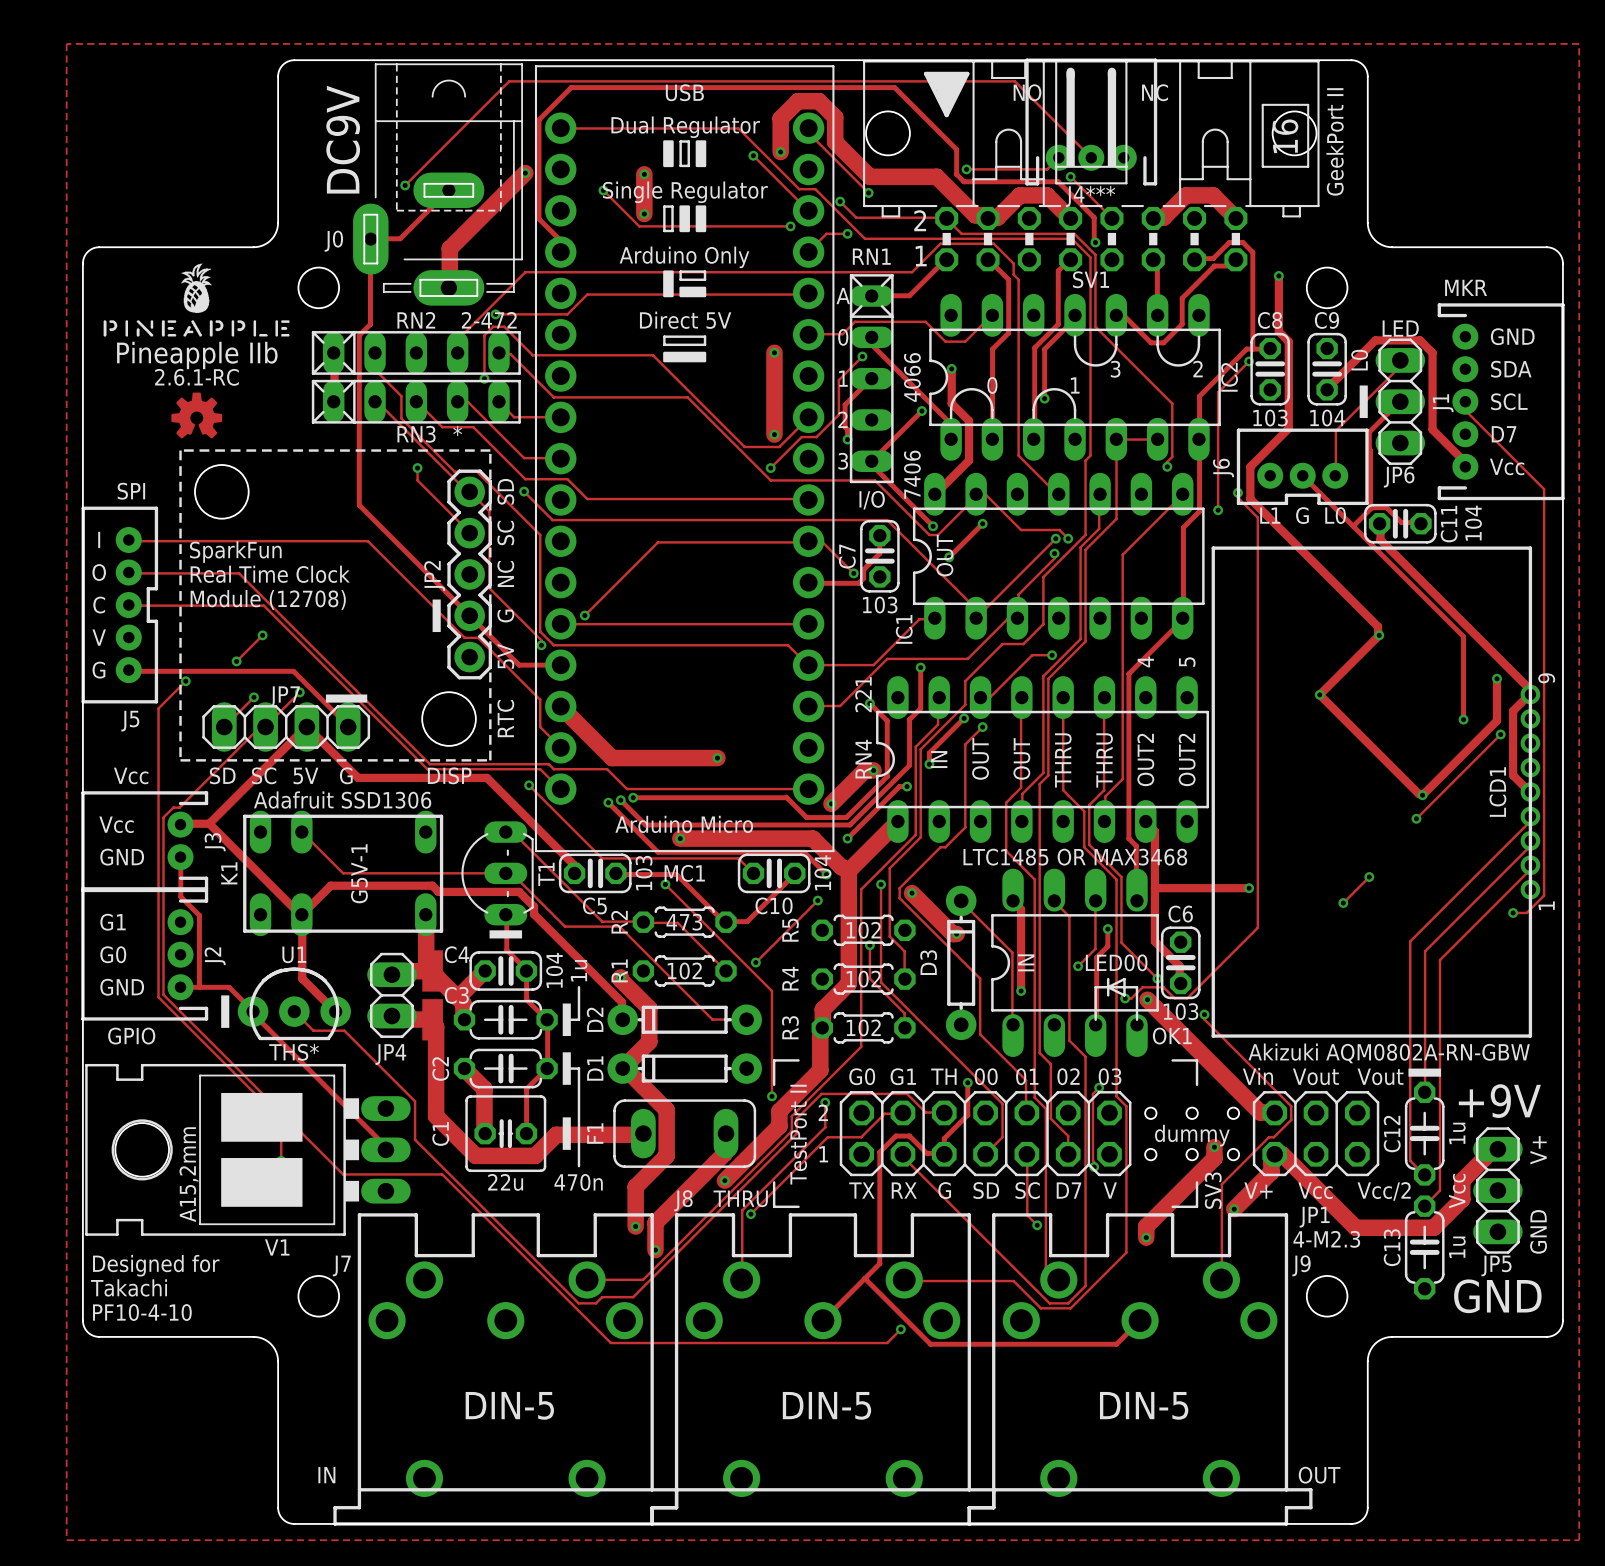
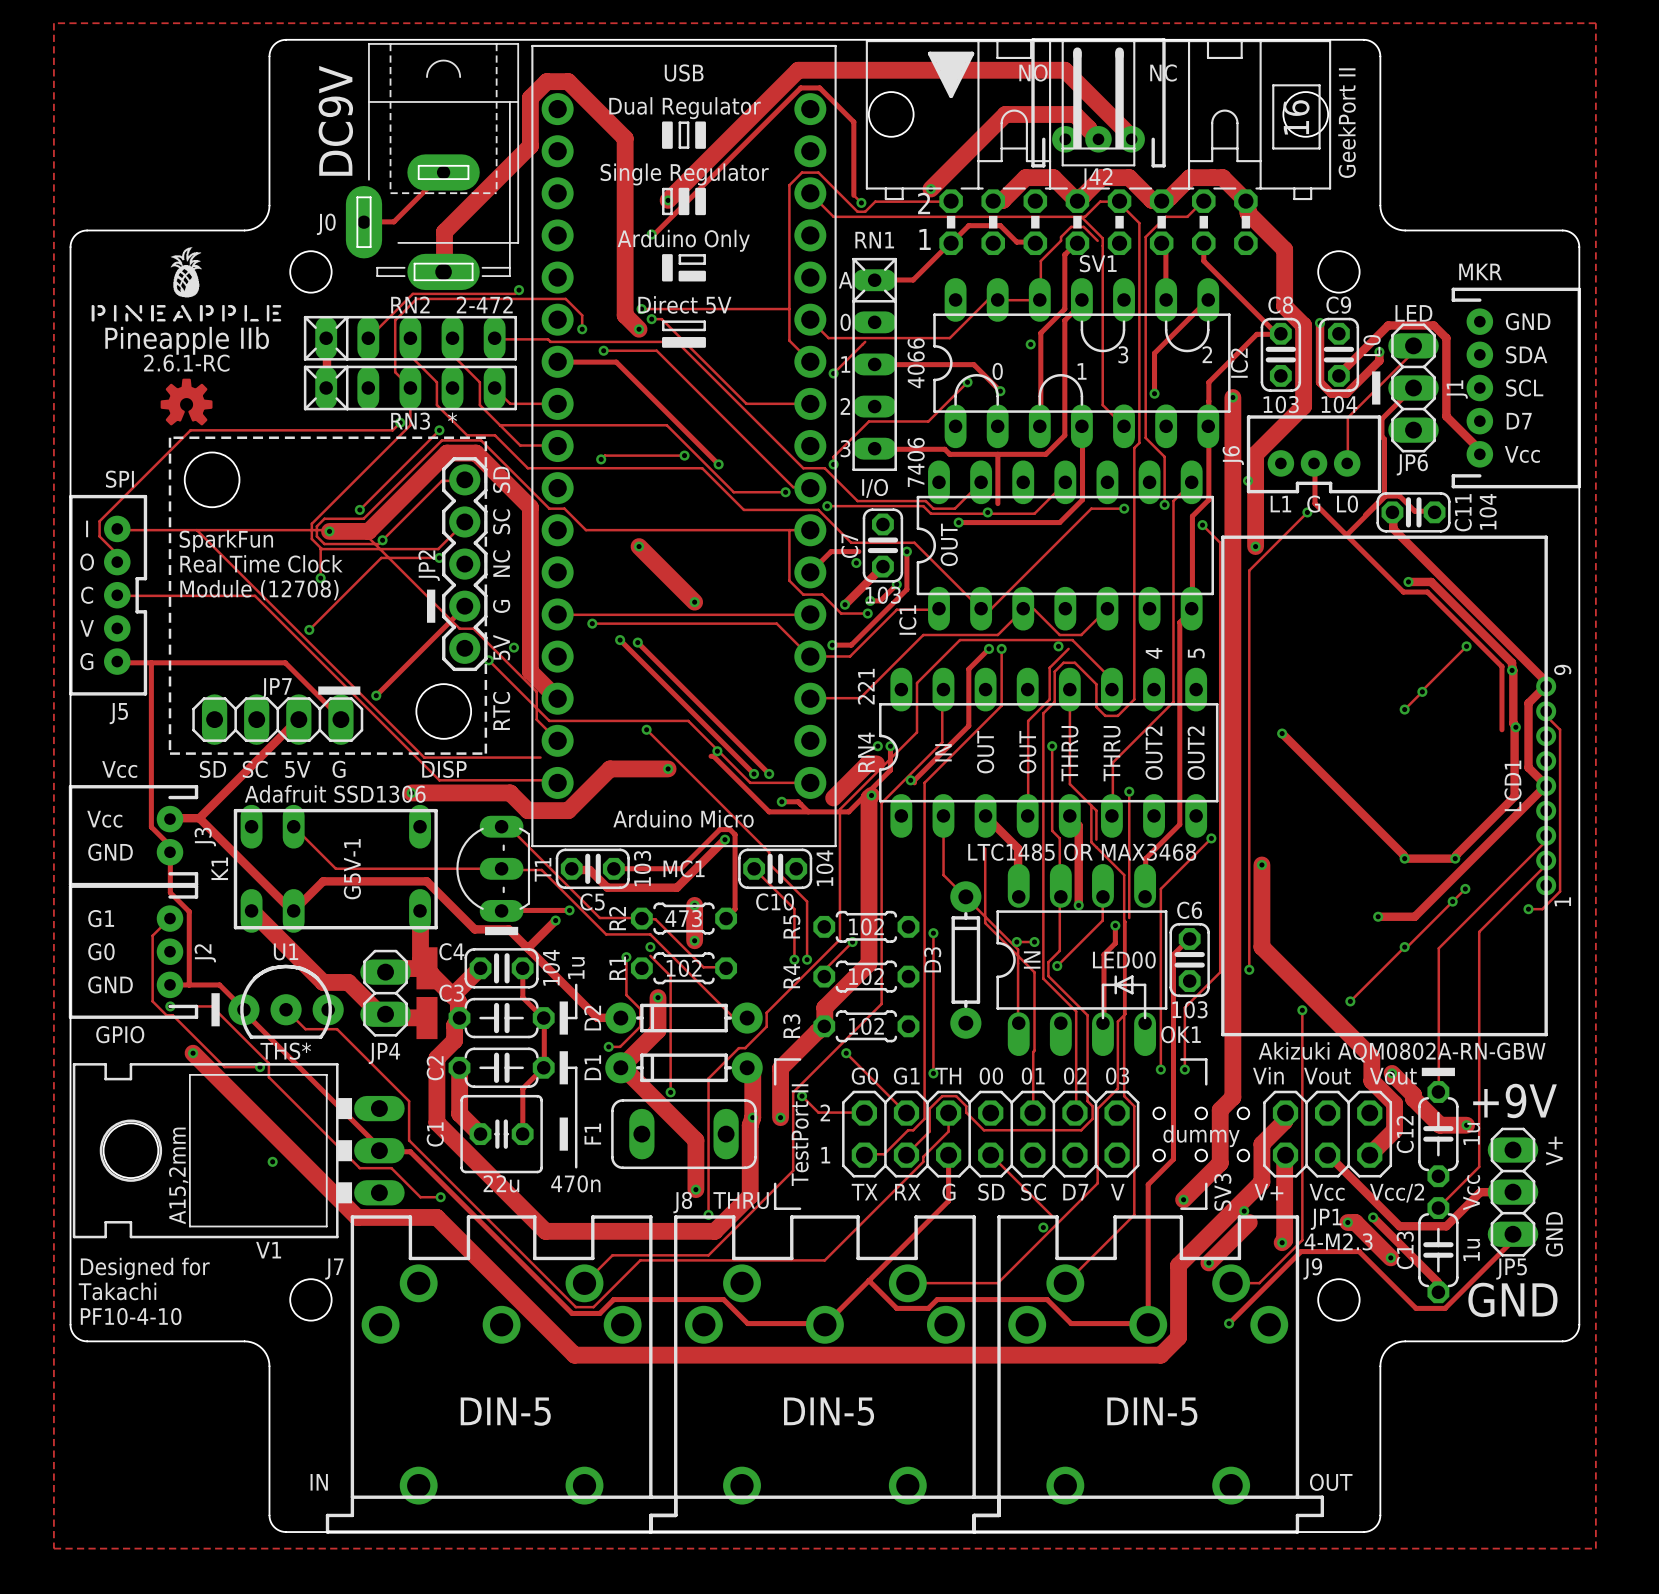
track: (560, 128) (738, 128) (799, 189) (816, 190) -> (810, 361) (789, 340) (789, 185) (802, 172) (818, 172)
track: (808, 128) (809, 133) (868, 192) -> none
track: (1081, 148) (1014, 81) (509, 81) (405, 185) -> (1088, 129) (1074, 114) (1005, 114) (930, 189)
track: (780, 152) (780, 118) (798, 101) (819, 101) (835, 117) (835, 142) (869, 176) (936, 176) (975, 215) (988, 218) -> none
via: (780, 152) -> none
track: (753, 155) (808, 210) -> none
via: (753, 155) -> none
track: (1058, 157) (1047, 169) (966, 169) -> none
track: none -> (1131, 139) (1130, 135) (1064, 70) (798, 70) (668, 200)
via: (966, 169) -> none
track: none -> (521, 154) (530, 146) (530, 98) (546, 81) (568, 81) (625, 138) (625, 315) (639, 329)
via: (525, 173) -> none
track: (644, 174) (644, 213) -> none
via: (644, 174) -> none
track: (1070, 176) (1111, 218) -> none
via: (1070, 176) -> none
via: (405, 185) -> none
track: (603, 190) (639, 226) (790, 226) -> none
via: (603, 190) -> none
via: (868, 192) -> none
track: (1185, 195) (1163, 217) (1153, 218) -> (1194, 177) (1189, 177) (1169, 197) (1161, 201) (1152, 200) (1129, 177) (1101, 177) (1077, 201)
J4*** name: J4*** (1090, 196) -> J42 (1096, 178)
track: (840, 201) (851, 212) -> (651, 234) (654, 234) (800, 87) (819, 87) (853, 122) (853, 195)
via: (840, 201) -> none
via: none -> (930, 189)
via: (644, 213) -> none
via: none -> (668, 200)
track: (856, 217) (945, 217) (961, 233) -> (850, 216) (966, 216)
track: none -> (1203, 201) (1187, 216) (1165, 216) (1145, 237) (1145, 437) (1164, 456) (1164, 504)
track: none -> (1245, 201) (1248, 213) (1284, 249) (1284, 306) (1303, 325) (1303, 406) (1255, 454) (1255, 546)
via: none -> (861, 202)
via: (790, 226) -> none
track: (855, 228) (864, 238) (1071, 238) (1076, 243) -> (857, 211) (865, 211) (875, 201) (951, 201)
track: (831, 233) (826, 233) (808, 252) -> (833, 216) (810, 193)
via: (847, 233) -> none
track: (370, 239) (370, 324) (359, 335) (359, 505) (519, 665) (560, 665) -> none
track: (1095, 242) (1094, 217) (1058, 181) (964, 181) (956, 174) (956, 149) (894, 87) (571, 87) (539, 119) (539, 218) (560, 240) (560, 252) -> none
via: (1095, 242) -> none
track: none -> (1083, 226) (1071, 226) (1061, 237) (1061, 240) (1040, 261) (1039, 300) (997, 300)
via: none -> (651, 234)
track: (1090, 257) (1090, 455) (1085, 460) (1085, 534) (1043, 577) (1043, 624) (1023, 644) (1002, 644) (965, 681) (965, 704) (920, 749) (920, 789) -> (970, 737) (924, 782)
track: none -> (951, 243) (968, 225) (1000, 225) (1016, 242) (1035, 243)
track: (988, 259) (1008, 279) (1008, 332) (992, 349) (992, 439) -> none
track: (1194, 259) (1213, 258) (1229, 242) (1242, 242) (1252, 252) (1252, 349) -> (1203, 243) (1203, 261) (1275, 333) (1280, 333)
track: (1235, 259) (1229, 266) (1214, 266) (1182, 298) (1182, 324) (1163, 342) (1151, 342) (1123, 315) (1116, 315) -> none
track: (1278, 275) (1278, 331) (1288, 341) (1288, 428) (1250, 466) (1250, 499) (1378, 626) (1379, 635) (1319, 694) (1418, 793) (1422, 795) (1496, 720) (1496, 678) -> none
via: (1278, 275) -> none
track: (808, 293) (587, 294) (567, 314) -> (582, 329) (582, 315) (564, 298)
track: none -> (519, 290) (515, 293) (412, 293) (368, 338)
via position: (495, 314) -> (519, 290)
track: (991, 315) (965, 341) (945, 341) (925, 321) (855, 321) (842, 334) (808, 334) -> (996, 300) (987, 300) (949, 338) (828, 338) (810, 319)
track: none -> (1208, 299) (1154, 353) (1154, 393)
track: none -> (641, 309) (789, 309)
via: none -> (641, 309)
track: (1095, 326) (1172, 403) (1172, 456) (1167, 461) (1167, 466) -> (1102, 311) (1102, 405) (1124, 426)
via: none -> (651, 319)
track: (1058, 335) (1044, 349) (1044, 398) -> (1064, 320) (1064, 435) (1045, 454) (949, 454) (944, 449) (874, 448)
track: (871, 337) (872, 345) (950, 423) (951, 439) -> none
track: none -> (1320, 322) (1320, 382) (1331, 393) (1346, 393) (1379, 360) (1379, 352)
via: none -> (1320, 322)
via: none -> (582, 329)
via: none -> (639, 329)
track: (375, 352) (375, 370) (401, 396) (401, 418) (454, 471) (477, 471) (540, 534) (540, 631) (553, 645) (788, 645) -> (592, 623) (776, 623) (789, 636)
track: none -> (410, 338) (411, 357) (436, 382) (436, 405) (467, 435) (495, 435) (527, 468) (702, 468) (743, 509) (818, 509) (851, 542) (914, 542) (981, 608)
track: (457, 352) (458, 339) (525, 272) (912, 272) (940, 243) (993, 243) (1013, 263) (1013, 274) (1018, 279) (1018, 455) (1058, 495) -> (827, 506) (923, 506) (930, 513) (1034, 513) (1064, 483)
track: (774, 352) (774, 434) -> none
via: (774, 352) -> none
track: (510, 354) (553, 397) (687, 397) (770, 480) (801, 480) -> (506, 339) (548, 339) (550, 341) (676, 341) (803, 468)
via: (862, 356) -> none
via: none -> (1030, 344)
track: (1249, 361) (1218, 392) (1218, 510) -> none
via: (1249, 361) -> none
via: none -> (603, 350)
via: none -> (1379, 352)
track: (951, 368) (951, 403) (969, 420) (969, 460) (934, 494) -> none
via: (951, 368) -> none
track: none -> (557, 361) (616, 362) (718, 464)
track: (484, 378) (484, 335) (493, 326) (504, 326) (532, 355) (653, 355) (744, 446) (779, 446) (808, 417) -> (651, 319) (661, 319) (746, 403) (810, 403)
via: (484, 378) -> none
track: (871, 378) (845, 404) (845, 427) (847, 429) (847, 439) -> (874, 364) (973, 364) (1000, 391)
track: (838, 380) (838, 414) (816, 437) (801, 437) (770, 468) -> (841, 365) (833, 373)
via: none -> (833, 373)
track: none -> (967, 382) (928, 421) (868, 421) (833, 456) (833, 464)
via: none -> (967, 382)
via: (1044, 398) -> none
track: (375, 401) (377, 402) (467, 491) (469, 491) -> none
track: (416, 401) (442, 427) (473, 427) (525, 479) (567, 479) (587, 499) (791, 499) -> (603, 350) (656, 350) (793, 487)
track: (1465, 401) (1466, 411) (1544, 489) (1544, 736) -> (1546, 711) (1546, 715) (1560, 729)
track: (460, 402) (468, 402) (484, 418) -> (452, 338) (453, 355) (479, 382) (479, 405)
via: none -> (1000, 391)
via: none -> (1154, 393)
track: (921, 411) (871, 461) (872, 465) (933, 526) -> none
via: (921, 411) -> none
via: none -> (1232, 397)
via: (774, 434) -> none
track: none -> (400, 422) (392, 430) (190, 430) (99, 521) (99, 536) (117, 554) (117, 562)
via: none -> (400, 422)
track: none -> (500, 425) (666, 425) (733, 492) (785, 492)
via: (847, 439) -> none
track: none -> (1081, 426) (1082, 499) (1059, 522) (958, 522)
track: (1116, 439) (1116, 518) (1085, 549) (1085, 641) (1048, 679) -> (1081, 216) (1085, 216) (1100, 201) (1119, 201) (1139, 223) (1139, 442) (1134, 448) (1134, 699) (1117, 715) (1105, 715) (1096, 707) (1096, 684) (1074, 662) (1063, 662) (1054, 671)
track: (1157, 439) (1116, 439) -> none
track: none -> (439, 430) (359, 509)
via: none -> (439, 430)
track: (1370, 450) (1371, 507) -> (1383, 437) (1385, 496) (1346, 535)
track: none -> (997, 454) (997, 503)
via: (1167, 466) -> none
track: (417, 468) (417, 480) (469, 533) -> (491, 298) (416, 298) (395, 320) (395, 372) (410, 387) (410, 425) (311, 523) (311, 538) (321, 549) (438, 549) (464, 521)
via: (417, 468) -> none
track: none -> (684, 455) (604, 455) (601, 459)
via: none -> (684, 455)
via: (770, 468) -> none
via: none -> (601, 459)
via: none -> (718, 464)
via: none -> (833, 464)
track: (1303, 476) (1463, 636) (1463, 719) -> (1314, 464) (1314, 503) (1403, 592) (1427, 592) (1501, 666) (1501, 729)
track: (822, 480) (874, 480) (929, 534) (938, 534) (976, 496) (976, 494) (986, 495) (1021, 530) (1059, 530) (1068, 538) -> (824, 468) (857, 501) (925, 501) (933, 508) (954, 508) (981, 482)
track: (469, 491) (489, 511) (489, 588) (541, 640) (541, 645) -> (464, 479) (441, 480) (378, 544) (324, 544) (316, 536) (316, 526) (324, 518) (363, 518) (441, 440) (481, 440) (520, 479)
via: (524, 491) -> none
track: (1237, 492) (1237, 497) (1257, 517) (1257, 927) (1210, 974) -> (1202, 525) (1220, 542) (1220, 972)
track: (1100, 494) (1099, 528) (1080, 547) (1080, 639) (1061, 657) -> none
via: none -> (785, 492)
via: (1218, 510) -> none
track: (1164, 512) (1122, 554) (1122, 779) (1105, 796) -> (1173, 501) (1173, 701) (1112, 762) (1112, 790)
via: none -> (1164, 504)
via: none -> (827, 506)
track: (567, 520) (887, 520) (980, 613) (976, 618) -> (564, 508) (585, 530) (810, 530)
via: none -> (1124, 508)
via: none -> (359, 509)
track: (982, 523) (949, 557) -> none
track: none -> (1307, 512) (1249, 570) (1249, 969)
via: none -> (1307, 512)
via: (933, 526) -> none
via: none -> (958, 522)
track: (879, 535) (879, 553) (863, 569) (863, 578) (858, 583) (808, 582) -> (858, 551) (831, 551) (810, 572)
via: none -> (1202, 525)
track: (1055, 538) (976, 618) -> (1124, 508) (1091, 508) (991, 608) (981, 608)
via: (1055, 538) -> none
via: (1068, 538) -> none
track: none -> (789, 530) (789, 580) (803, 594) (822, 594) (841, 613) (867, 613)
via: none -> (329, 531)
via: none -> (382, 540)
track: (1054, 553) (1054, 558) (1018, 594) (1017, 618) -> (1107, 608) (1081, 635) (1059, 635) (1034, 609) (1023, 608)
via: (1054, 553) -> none
track: none -> (639, 546) (694, 602)
via: none -> (639, 546)
via: (949, 557) -> none
via: none -> (1255, 546)
track: none -> (321, 548) (320, 578)
track: none -> (906, 551) (906, 589) (851, 645) (832, 645)
via: none -> (906, 551)
track: none -> (439, 557) (381, 557) (309, 629)
via: none -> (439, 557)
track: (128, 572) (239, 573) -> (196, 530) (229, 562)
track: (853, 573) (822, 542) (657, 542) (584, 615) -> none
track: none -> (882, 566) (844, 604)
via: none -> (320, 578)
track: none -> (1408, 581) (1431, 581) (1512, 662) (1514, 796) (1456, 854) (1455, 858) (1404, 858) (1403, 854) (1282, 733)
via: none -> (1408, 581)
track: none -> (896, 584) (880, 600) (870, 600)
via: none -> (896, 584)
via: none -> (870, 600)
via: none -> (694, 602)
via: none -> (844, 604)
track: none -> (464, 606) (376, 695)
via position: (584, 615) -> (592, 623)
track: (919, 619) (873, 665) (847, 665) -> (923, 609) (896, 609) (850, 656)
track: (1017, 619) (1007, 619) (967, 658) (887, 658) (840, 706) -> (1023, 609) (997, 635) (923, 635) (860, 698) (842, 698)
via: none -> (867, 613)
track: (1171, 631) (1128, 673) (1128, 838) (1136, 846) (1137, 900) -> (1179, 622) (1179, 824) (1145, 858) (1145, 896)
track: (262, 635) (236, 661) -> none
via: (262, 635) -> none
via: (1379, 635) -> none
via: none -> (309, 629)
via position: (541, 645) -> (513, 647)
track: none -> (620, 640) (754, 773)
via: none -> (620, 640)
track: none -> (637, 642) (769, 773)
via: none -> (637, 642)
via: none -> (832, 645)
track: (1052, 655) (1032, 655) (990, 697) (980, 697) -> none
track: none -> (1466, 646) (1404, 709)
via: none -> (1466, 646)
track: none -> (989, 648) (968, 669) (968, 725) (914, 780) (914, 782)
via: none -> (989, 648)
track: none -> (1001, 648) (1001, 705) (987, 719)
via: none -> (1001, 648)
via: (236, 661) -> none
track: (920, 667) (920, 708) (909, 719) (909, 765) (850, 824) (645, 824) (620, 800) -> none
via: (920, 667) -> none
via: none -> (488, 660)
track: none -> (151, 662) (151, 827) (170, 846) (170, 852)
track: (185, 681) (158, 708) (158, 997) (281, 1119) (281, 1160) -> none
via: (185, 681) -> none
track: (299, 692) (265, 727) (260, 727) (179, 807) (173, 807) (163, 817) (163, 938) -> (170, 918) (152, 935)
via: (299, 692) -> none
via: (1319, 694) -> none
track: (253, 697) (224, 727) -> none
via: (253, 697) -> none
track: (1021, 697) (1021, 787) (1006, 802) (1006, 851) (1034, 879) (1034, 1097) (1045, 1108) (1045, 1267) (1058, 1279) -> none
track: (1104, 697) (1104, 790) (1089, 805) (1089, 816) -> (1091, 805) (1096, 810)
track: none -> (1111, 689) (1111, 679) (1072, 640) (959, 640) (917, 683) (917, 732) (839, 809) (839, 939) (766, 1012) (766, 1026) (745, 1048) (738, 1048) (708, 1078) (708, 1214)
via: none -> (1422, 691)
via: none -> (376, 695)
track: (869, 703) (887, 720) (887, 753) -> none
via: (869, 703) -> none
track: (560, 706) (612, 758) (717, 758) -> (557, 698) (530, 671) (530, 507) (476, 453) (447, 453) (368, 531) (329, 531)
track: (1043, 707) (1043, 772) (1022, 793) -> (1049, 699) (1028, 720) (1028, 787)
track: (1048, 709) (1048, 775) (1039, 784) (1039, 1053) (1050, 1064) (1050, 1118) (1068, 1136) (1068, 1154) -> (1054, 701) (1043, 713) (1043, 978) (1076, 1011)
via: none -> (1404, 709)
track: (964, 718) (929, 753) (929, 764) -> none
via: (964, 718) -> none
via: (1463, 719) -> none
track: (938, 724) (915, 746) (915, 834) (861, 889) (861, 1046) (791, 1116) -> (942, 717) (942, 742) (881, 803) (881, 1003) (793, 1092) (793, 1116)
track: (306, 727) (358, 777) (486, 777) (573, 864) (574, 873) -> (724, 839) (676, 887) (607, 887) (589, 870) (571, 868)
via: (982, 727) -> none
track: (1500, 734) (1416, 818) -> none
track: none -> (646, 729) (769, 852) (769, 863) (807, 901) (807, 959)
via: none -> (646, 729)
via: none -> (1282, 733)
track: (965, 744) (965, 827) (945, 847) (940, 847) (899, 888) (899, 898) (980, 978) (980, 1034) (1026, 1080) (1026, 1112) -> (985, 848) (985, 923) (1034, 972) (1032, 1113)
via: none -> (877, 746)
via: none -> (890, 746)
track: none -> (1052, 746) (1052, 830) (1059, 838) (1060, 896) (1059, 950) (1048, 962) (1048, 976) (1087, 1015) (1087, 1101) (1092, 1106)
via: none -> (1052, 746)
track: none -> (711, 756) (713, 756) (769, 811) (808, 811)
track: (543, 764) (548, 764) (553, 769) (607, 769) (626, 789) (749, 789) -> (488, 660) (549, 720) (688, 720) (750, 782)
via: (929, 764) -> none
track: (427, 769) (540, 769) (557, 786) -> (421, 762) (439, 780) (554, 780)
via: (873, 770) -> none
track: (1513, 774) (1530, 792) -> (1528, 767) (1546, 785) (1414, 916) (1378, 916)
track: none -> (668, 768) (609, 768) (568, 810) (527, 810) (510, 792) (411, 792)
via: none -> (668, 768)
via: none -> (754, 773)
via: none -> (769, 773)
track: (529, 785) (602, 858) (738, 858) (753, 873) -> (794, 959) (794, 909) (754, 868)
via: (529, 785) -> none
track: (907, 786) (899, 786) (847, 838) -> none
via: (1422, 795) -> none
track: (633, 797) (786, 797) (796, 807) -> (781, 801) (798, 801)
via: (633, 797) -> none
via: none -> (1129, 791)
via: none -> (411, 792)
via: (620, 800) -> none
via: none -> (871, 795)
track: (608, 802) (657, 852) (804, 852) (826, 874) -> none
via: (608, 802) -> none
via: (831, 803) -> none
via: none -> (781, 801)
track: (1530, 816) (1529, 822) (1410, 941) (1410, 1160) (1424, 1174) -> none
via: (1416, 818) -> none
track: (897, 821) (848, 870) -> none
track: none -> (943, 815) (943, 875) (965, 896)
track: none -> (1069, 815) (1078, 825) (1078, 905)
track: (1145, 821) (1154, 831) (1154, 941) (1179, 966) (1180, 983) -> none
track: (920, 837) (889, 868) (889, 936) (904, 951) (904, 979) -> (924, 832) (924, 1118) (913, 1130) (908, 1130) (884, 1154) (864, 1155)
track: (680, 838) (812, 838) (841, 867) (848, 870) -> none
via: (680, 838) -> none
via: (847, 838) -> none
track: none -> (1211, 838) (1160, 888) (1160, 1069)
via: none -> (1211, 838)
via: none -> (724, 839)
track: (1089, 844) (1121, 877) -> (1129, 791) (1129, 872)
via: none -> (1404, 858)
via: none -> (1455, 858)
track: none -> (1261, 864) (1261, 947) (1371, 1056) (1371, 1080) (1394, 1103) (1394, 1130) (1369, 1155)
track: (848, 870) (848, 983) -> (871, 795) (868, 797) (868, 963) (851, 981)
track: (615, 873) (676, 874) (726, 922) -> (613, 868) (680, 868) (719, 829) (730, 829) (735, 834) (735, 909) (726, 918)
track: (794, 873) (747, 921) (726, 921) -> none
track: (512, 874) (565, 926) (619, 926) (651, 958) -> (508, 870) (541, 870) (606, 934) (650, 934) (733, 1017)
via: (826, 874) -> none
track: (1369, 877) (1343, 903) -> none
via: (1369, 877) -> none
track: (665, 884) (771, 991) (771, 1096) -> none
via: (665, 884) -> none
track: (881, 884) (881, 982) (1002, 1103) (1002, 1137) (985, 1154) -> (1052, 1216) (990, 1155)
via: (881, 884) -> none
track: (1154, 888) (1249, 888) -> none
via position: (1249, 888) -> (1261, 864)
track: (438, 891) (519, 891) (534, 906) (534, 914) (622, 1002) (622, 1019) -> (433, 887) (474, 929) (508, 929) (597, 1017) (620, 1017)
track: (912, 893) (952, 934) (956, 934) -> none
via: (912, 893) -> none
track: none -> (1465, 888) (1350, 1001)
via: none -> (1465, 888)
track: (817, 900) (755, 962) -> none
via: (817, 900) -> none
track: (1013, 900) (1021, 909) (1021, 991) -> (1018, 896) (1018, 848) (985, 815)
track: (1054, 900) (1069, 916) (1069, 1013) -> none
via: (1343, 903) -> none
via: none -> (1452, 901)
track: none -> (694, 905) (694, 940)
via: none -> (694, 905)
via: none -> (1078, 905)
track: none -> (251, 910) (323, 982) (348, 982) (377, 1011) (385, 1014)
track: (301, 914) (302, 978) (335, 1011) -> none
track: (505, 914) (506, 950) (526, 970) -> (501, 910) (569, 910)
via: none -> (569, 910)
via: none -> (1378, 916)
track: (1121, 921) (1121, 942) (1157, 978) -> none
track: (656, 922) (677, 922) (724, 969) -> (655, 919) (703, 967) (724, 967)
track: none -> (555, 920) (527, 948)
via: none -> (555, 920)
track: (1095, 924) (1095, 948) (1078, 966) -> (1102, 920) (1057, 966)
track: none -> (1124, 920) (1125, 1014) (1117, 1021) (1117, 1088) (1097, 1108) (1097, 1183) (997, 1283) (907, 1283)
via: (956, 934) -> none
track: (1464, 935) (1439, 960) (1439, 1190) -> (1479, 931) (1479, 1166) (1453, 1192)
track: none -> (933, 933) (933, 1073)
via: none -> (933, 933)
track: none -> (1189, 938) (1173, 954) (1173, 1159) (1148, 1184) (1148, 1324) (1071, 1323) (1047, 1299) (937, 1299) (928, 1308) (896, 1308) (868, 1280)
via: none -> (694, 940)
track: none -> (852, 942) (824, 969) (824, 976)
track: (869, 945) (869, 978) (904, 1013) (904, 1027) -> none
via position: (869, 945) -> (852, 942)
track: none -> (1016, 942) (1034, 942)
via: none -> (1016, 942)
via: none -> (1034, 942)
via: none -> (650, 947)
via: none -> (1404, 947)
track: none -> (626, 957) (626, 995) (640, 1008) (640, 1026) (620, 1046) (608, 1046)
via: (755, 962) -> none
via: none -> (794, 959)
via: none -> (807, 959)
via: (1078, 966) -> none
via: none -> (1057, 966)
via: none -> (1249, 969)
track: (620, 977) (620, 979) (649, 1008) (649, 1041) -> (658, 997) (658, 1030) (647, 1040)
via position: (620, 977) -> (626, 957)
track: (671, 978) (712, 1019) (733, 1019) -> (670, 976) (670, 1092)
via: (1157, 978) -> none
via: (1021, 991) -> none
track: (163, 994) (343, 1174) (442, 1174) (610, 1343) (887, 1343) (900, 1329) -> (152, 992) (152, 1001) (166, 1015) (172, 1015) (224, 1067) (260, 1067)
track: (1125, 998) (1131, 998) (1142, 987) (1163, 987) (1174, 998) (1187, 998) -> (1184, 1069) (1184, 1007) (1196, 996)
via: (1125, 998) -> none
via: none -> (658, 997)
track: (1147, 999) (1260, 1112) (1274, 1112) -> (193, 1053) (357, 1217) (436, 1217) (574, 1355) (1160, 1355) (1178, 1337) (1178, 1265) (1261, 1182) (1261, 1144) (1284, 1121) (1285, 1113)
via: (1147, 999) -> none
via: none -> (1350, 1001)
track: none -> (170, 1006) (212, 1006) (268, 1063) (268, 1077) (359, 1168) (391, 1168) (420, 1197) (440, 1197)
via: none -> (170, 1006)
via: none -> (1302, 1010)
track: (1204, 1014) (1204, 1019) (1291, 1106) -> (1302, 1010) (1302, 1106)
via: (1204, 1014) -> none
track: (432, 1019) (436, 1026) (436, 1116) (442, 1122) -> (459, 1018) (454, 1025) (454, 1040) (436, 1058) (436, 1122)
track: (822, 1027) (820, 1035) (820, 1070) (779, 1111) -> (824, 1026) (780, 1068) (780, 1111)
track: (1069, 1040) (1085, 1056) (1085, 1106) -> (1076, 1039) (1074, 1113)
via: none -> (608, 1046)
via: none -> (193, 1053)
via: none -> (846, 1053)
via: none -> (260, 1067)
track: (464, 1069) (484, 1088) (484, 1133) -> (459, 1068) (459, 1113) (479, 1134)
via: none -> (1160, 1069)
via: none -> (1184, 1069)
track: none -> (1392, 1073) (1440, 1125) (1466, 1125)
via: none -> (1392, 1073)
track: (967, 1082) (967, 1114) (944, 1138) (944, 1154) (926, 1153) (909, 1136) (895, 1136) (879, 1152) (879, 1263) -> (948, 1155) (948, 1201) (882, 1266)
via position: (967, 1082) -> (933, 1073)
track: (1099, 1087) (1092, 1093) (1094, 1167) -> none
via: (1099, 1087) -> none
drawing: [221, 1092, 303, 1207] -> none
via: none -> (670, 1092)
via: (771, 1096) -> none
track: none -> (802, 1096) (818, 1112) (864, 1113)
via: none -> (802, 1096)
track: (825, 1102) (825, 1127) (742, 1210) (741, 1279) -> none
via: (825, 1102) -> none
track: (666, 1110) (666, 1155) (635, 1186) (635, 1226) -> (665, 1110) (695, 1140) (695, 1189)
track: (902, 1112) (884, 1113) (861, 1137) (827, 1137) (750, 1214) -> (906, 1113) (846, 1053)
track: (944, 1112) (925, 1112) (907, 1093) (821, 1093) (796, 1118) (796, 1133) (633, 1297) (602, 1297) -> (948, 1113) (948, 1131) (923, 1156) (923, 1161) (824, 1260) (640, 1260) (599, 1300)
via: none -> (752, 1117)
track: (779, 1117) (779, 1126) (724, 1180) -> none
via: none -> (780, 1117)
track: (1085, 1118) (1085, 1286) (1068, 1303) (1049, 1303) (903, 1157) (902, 1154) -> (1092, 1118) (1081, 1130) (983, 1130) (966, 1112) (966, 1106) (956, 1096) (942, 1096) (929, 1108) (929, 1131) (906, 1155)
track: (1291, 1119) (1273, 1137) (1268, 1137) (1221, 1184) (1221, 1279) -> (1302, 1120) (1302, 1240) (1259, 1283) (1231, 1283)
via: none -> (1466, 1125)
track: (791, 1131) (643, 1279) (587, 1279) -> (793, 1131) (793, 1170) (708, 1255) (612, 1255) (584, 1283)
track: (643, 1133) (556, 1134) (535, 1155) (475, 1155) -> (747, 1067) (752, 1073) (750, 1195) (714, 1231) (545, 1231) (471, 1156)
track: (726, 1133) (724, 1153) (655, 1222) (655, 1250) -> none
track: (1214, 1147) (1214, 1158) (1210, 1162) -> (1232, 397) (1232, 1097) (1220, 1110) (1220, 1163)
via: (1214, 1147) -> none
track: none -> (379, 1150) (410, 1151) (572, 1313) (599, 1313) (613, 1299) (723, 1299) (747, 1323) (824, 1324)
track: (1497, 1149) (1493, 1149) (1462, 1180) (1462, 1199) (1433, 1227) (1355, 1227) (1282, 1154) (1274, 1154) (1271, 1162) (1271, 1171) (1234, 1209) -> none
track: (1026, 1154) (1027, 1215) (1037, 1225) -> none
track: none -> (1285, 1155) (1284, 1240) (1282, 1242)
track: none -> (1327, 1155) (1399, 1226) (1446, 1226) (1480, 1192) (1513, 1192)
via: (1094, 1167) -> none
via: (724, 1180) -> none
via: none -> (695, 1189)
via: none -> (440, 1197)
track: (1174, 1198) (1146, 1226) (1146, 1237) -> none
via: none -> (1183, 1199)
via: none -> (708, 1214)
track: (1126, 1212) (1126, 1252) (1070, 1308) (1040, 1308) (1013, 1281) (904, 1279) -> (1134, 1214) (1065, 1283)
via: (750, 1214) -> none
track: none -> (1373, 1217) (1437, 1281) (1438, 1292)
via: none -> (1373, 1217)
track: none -> (1249, 1222) (1208, 1262)
track: none -> (1347, 1222) (1355, 1222) (1390, 1257)
via: none -> (1347, 1222)
via: (635, 1226) -> none
track: none -> (1513, 1234) (1512, 1241) (1445, 1308) (1416, 1308) (1359, 1251) (1301, 1251) (1229, 1323)
via: (1146, 1237) -> none
via: none -> (1282, 1242)
via: (655, 1250) -> none
via: none -> (1390, 1257)
via: none -> (1208, 1262)
track: (864, 1278) (930, 1344) (1116, 1344) (1140, 1320) -> none
via: none -> (1229, 1323)
via: (900, 1329) -> none

